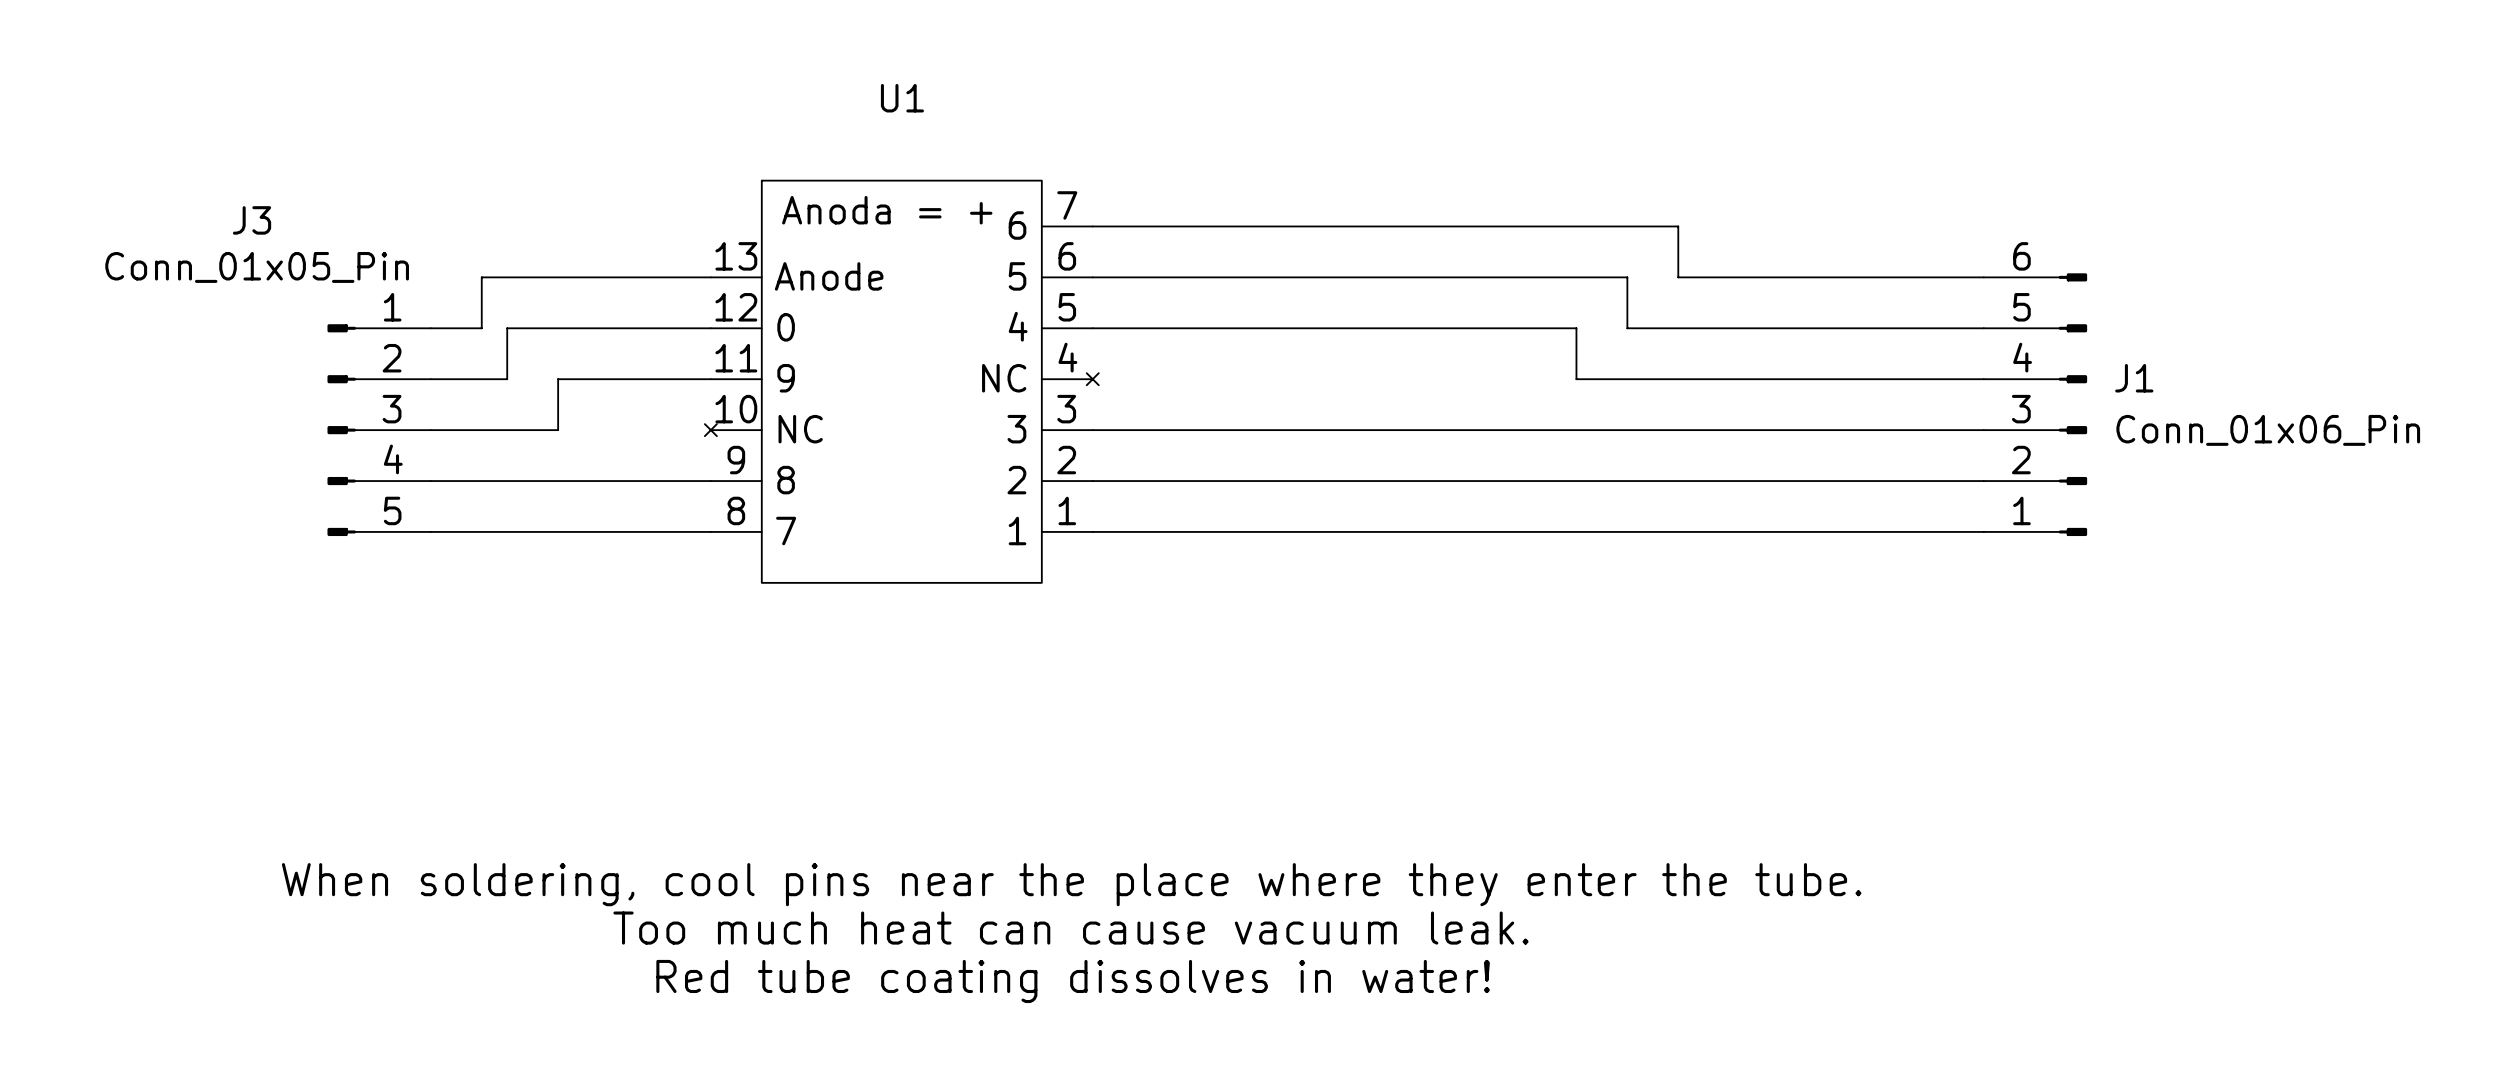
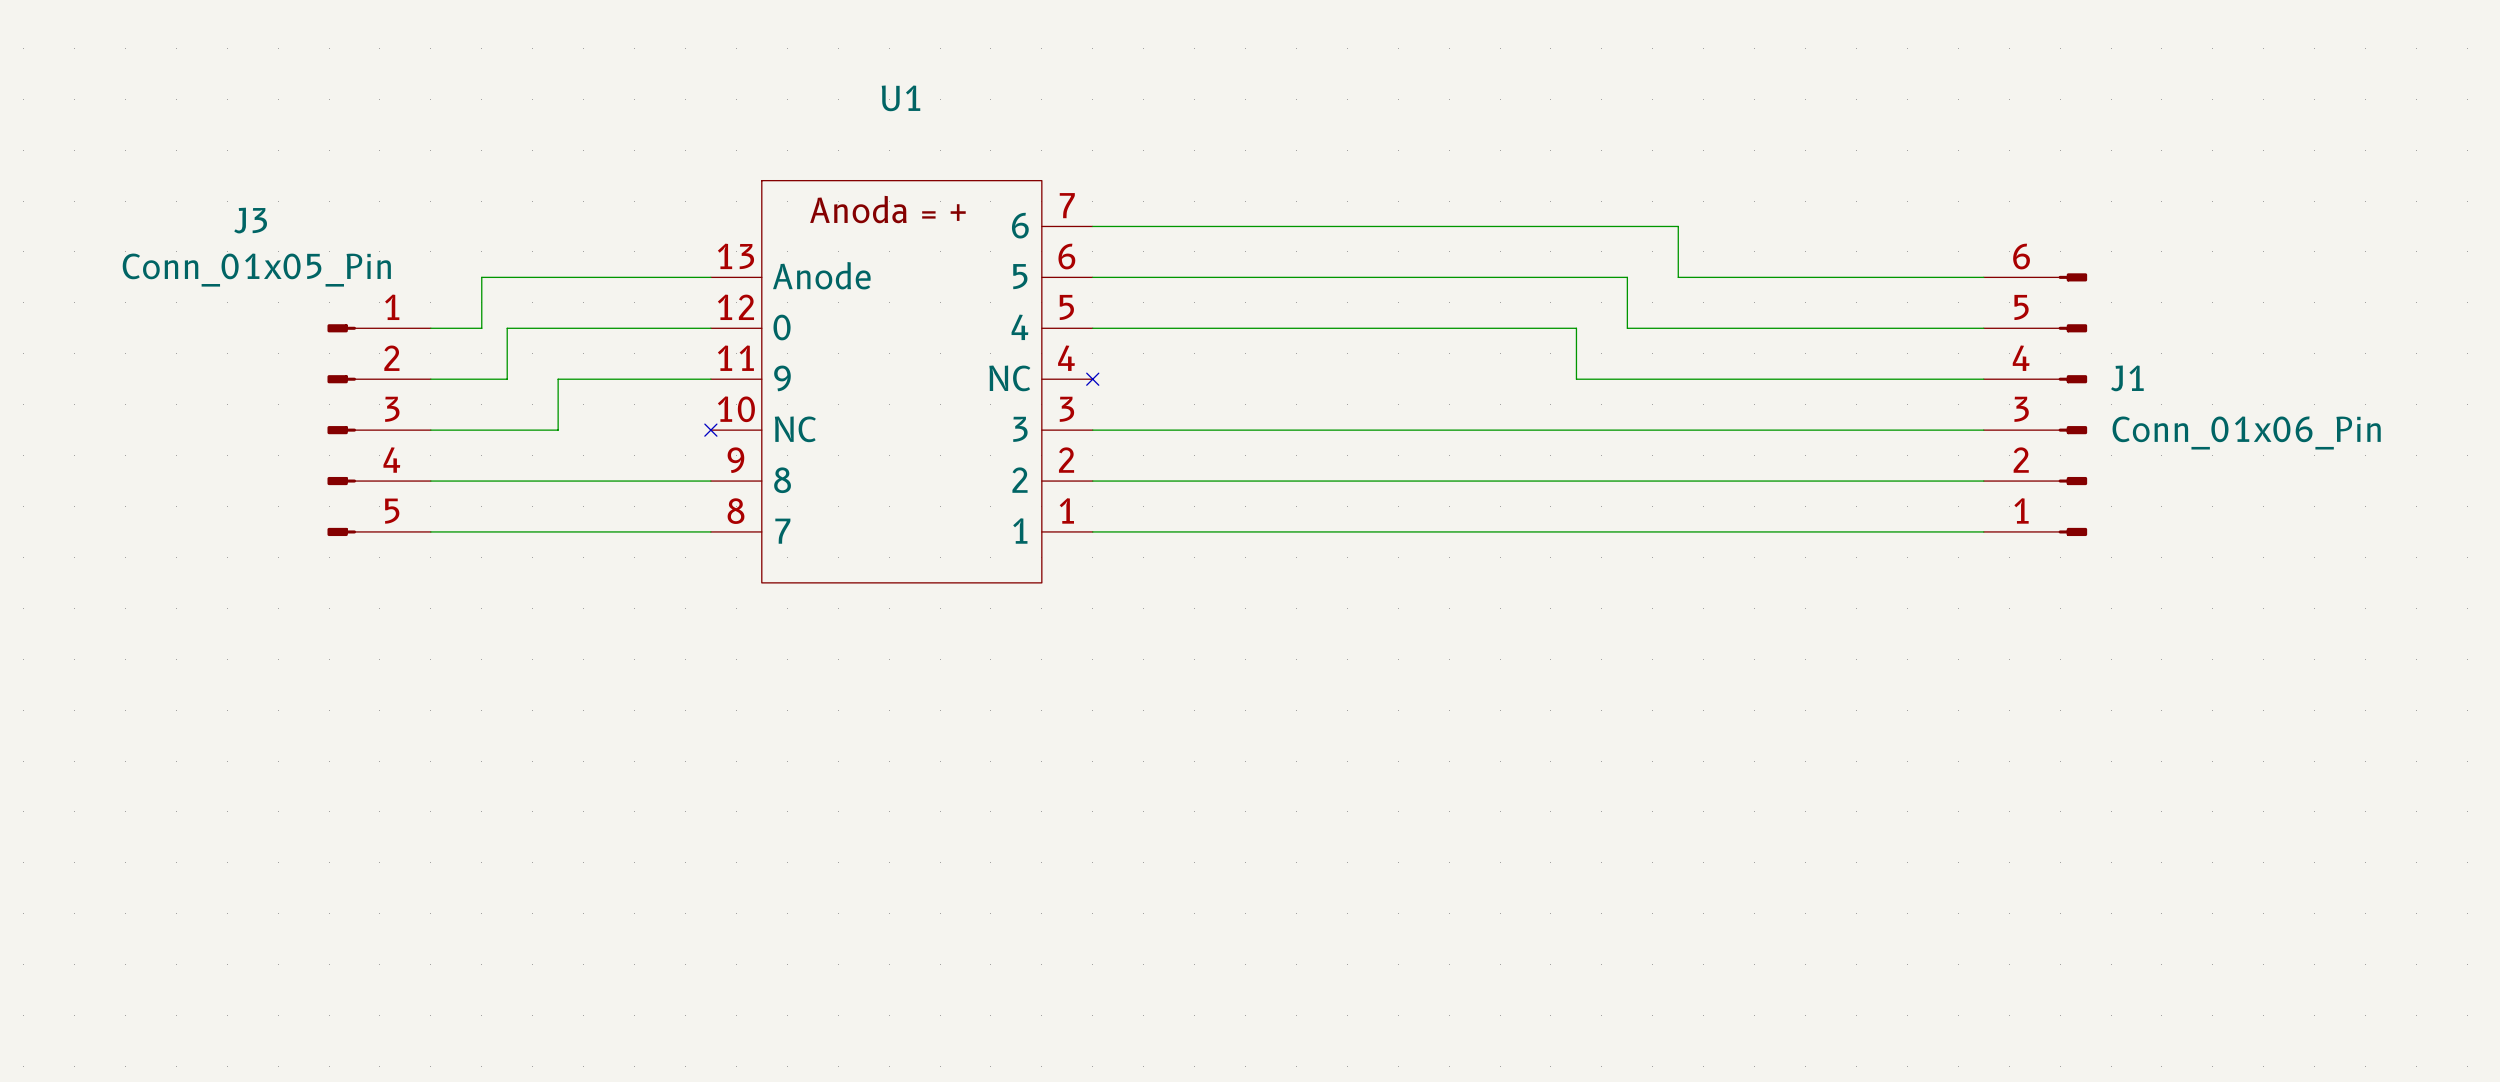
text: When soldering, cool pins near the place where they enter the tube. (1071, 884) -> none
text: Too much heat can cause vacuum leak. (1070, 928) -> none
text: Red tube coating dissolves in water! (1073, 981) -> none

